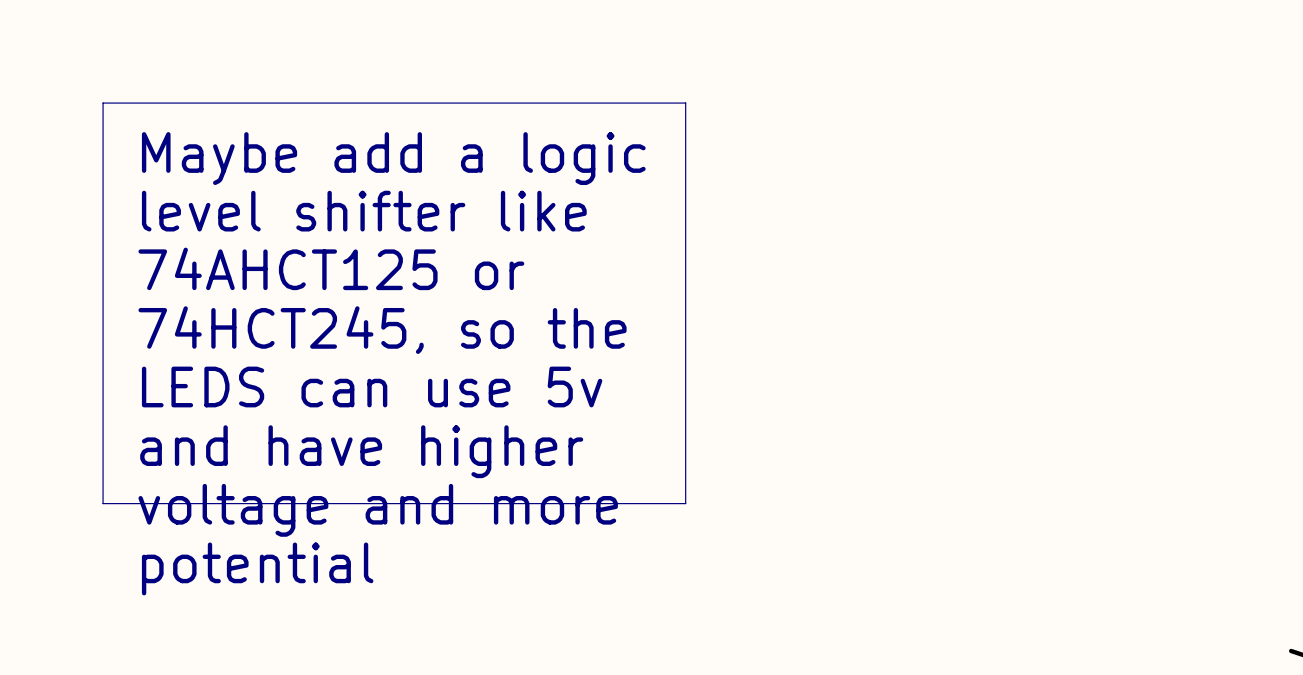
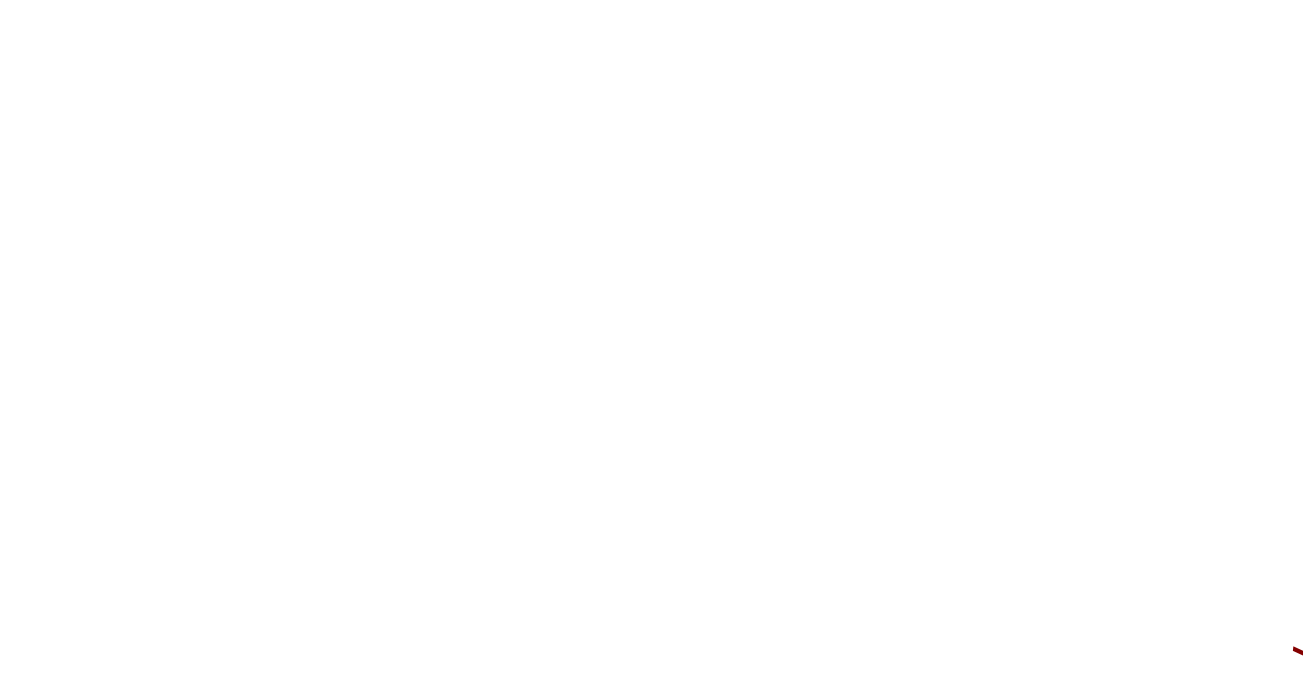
line: (103, 103) (685, 103) (685, 503) (103, 503) (103, 103) -> none
text: Maybe add a logic (393, 158) -> none
text: level shifter like (364, 211) -> none
text: 74AHCT125 or (331, 268) -> none
text: 74HCT245, so the (382, 330) -> none
text: LEDS can use 5v (372, 387) -> none
text: and have higher (361, 451) -> none
text: voltage and more (378, 510) -> none
text: potential (257, 568) -> none

